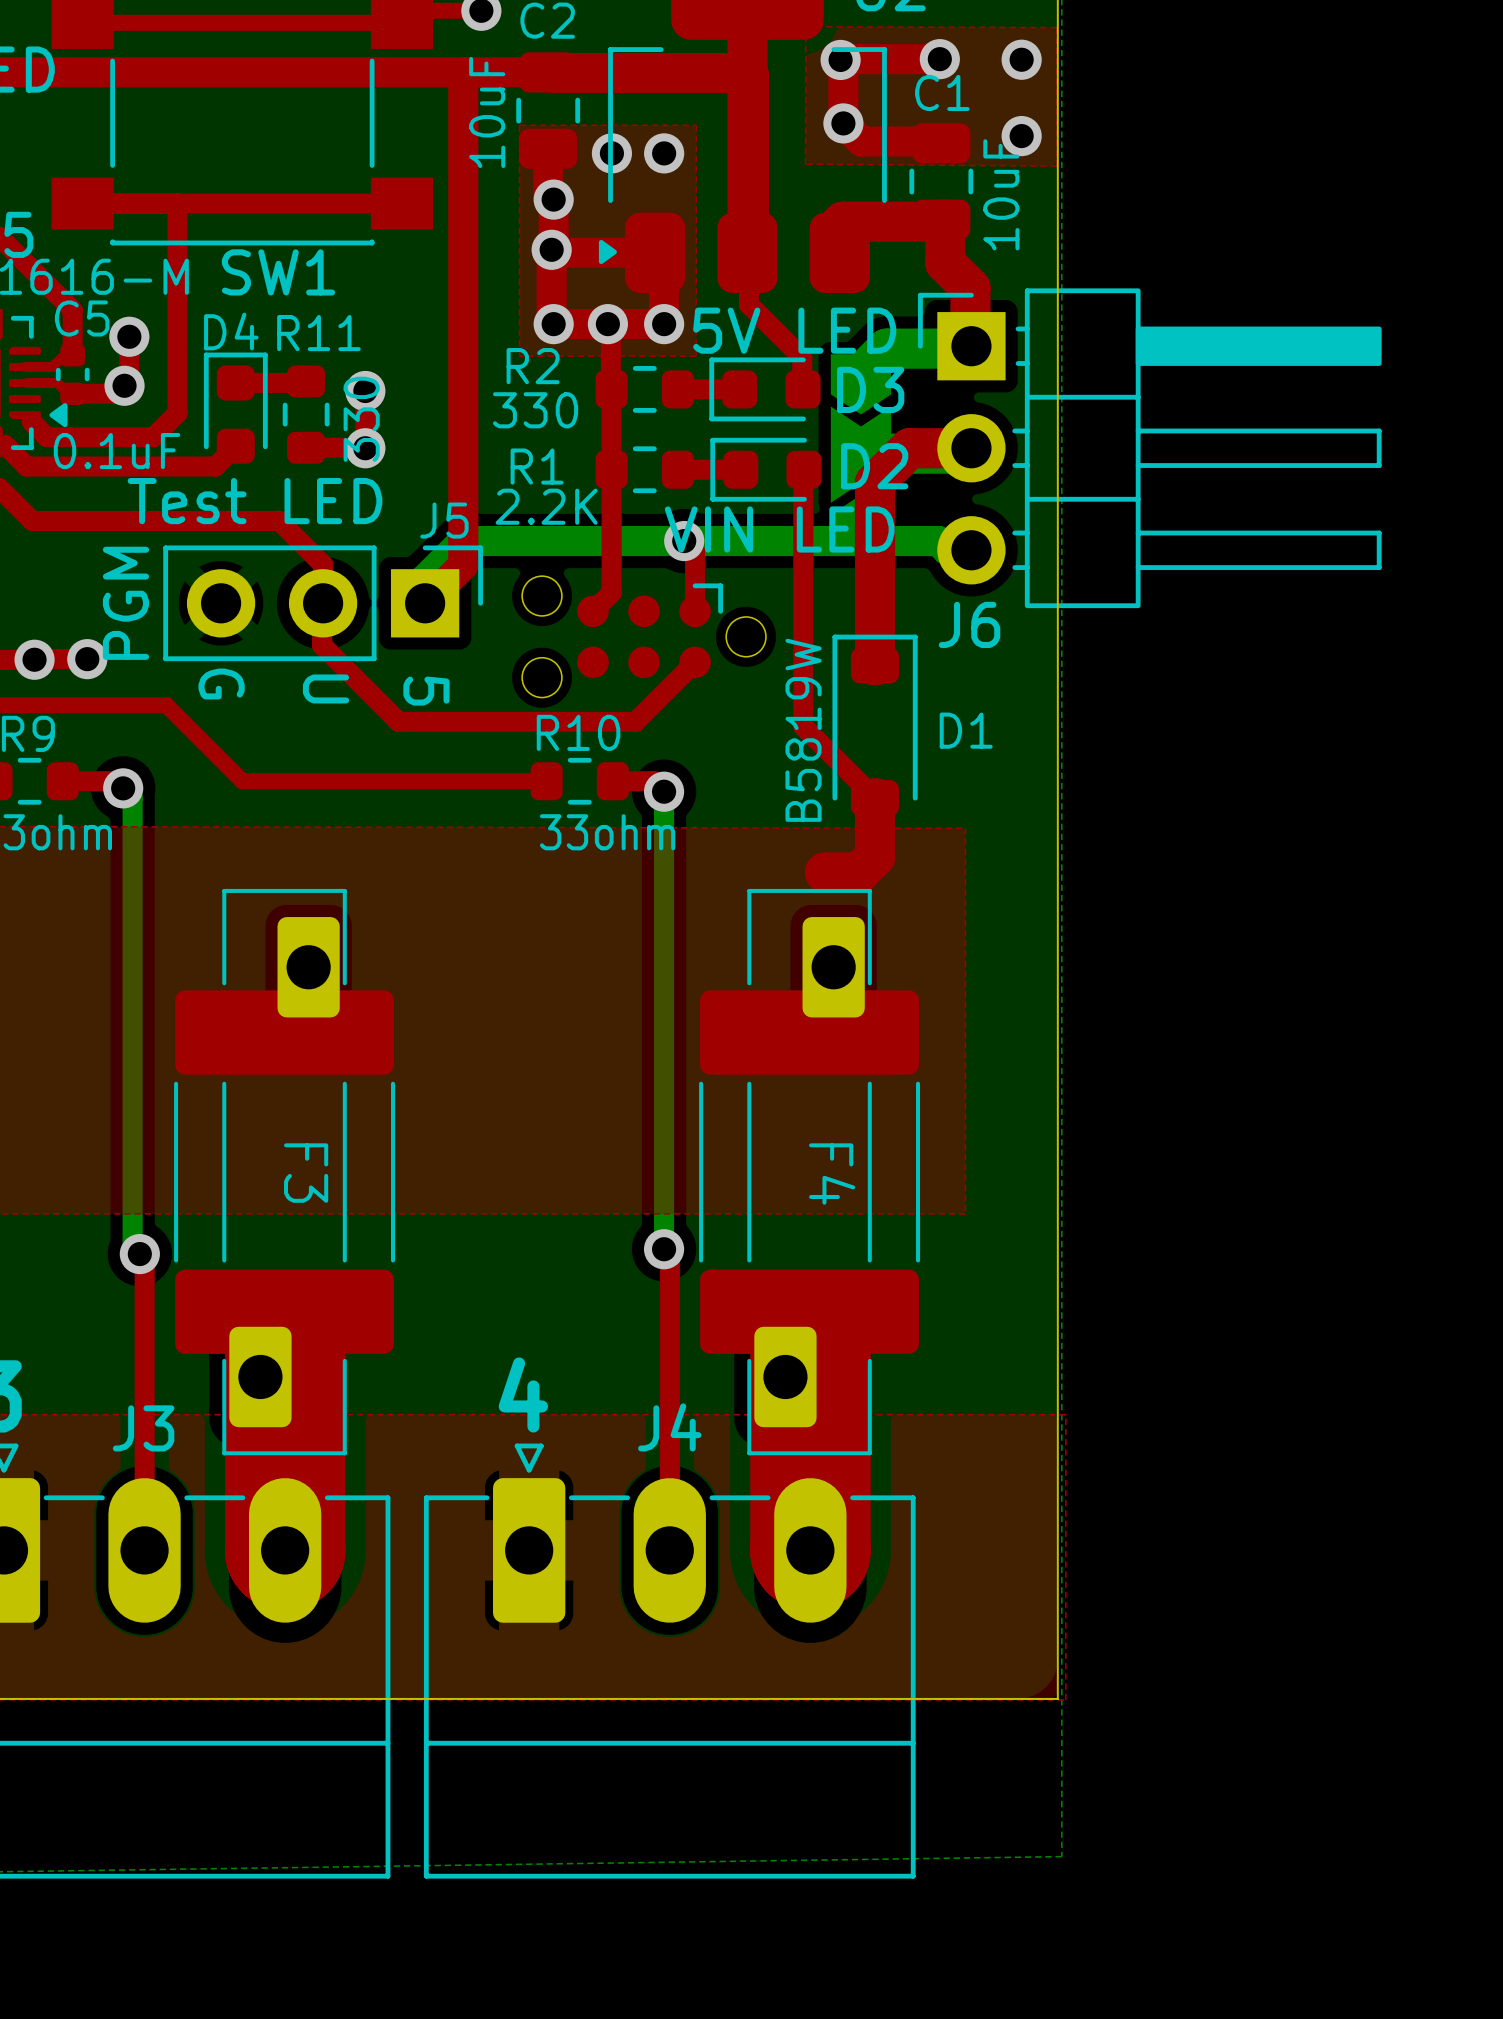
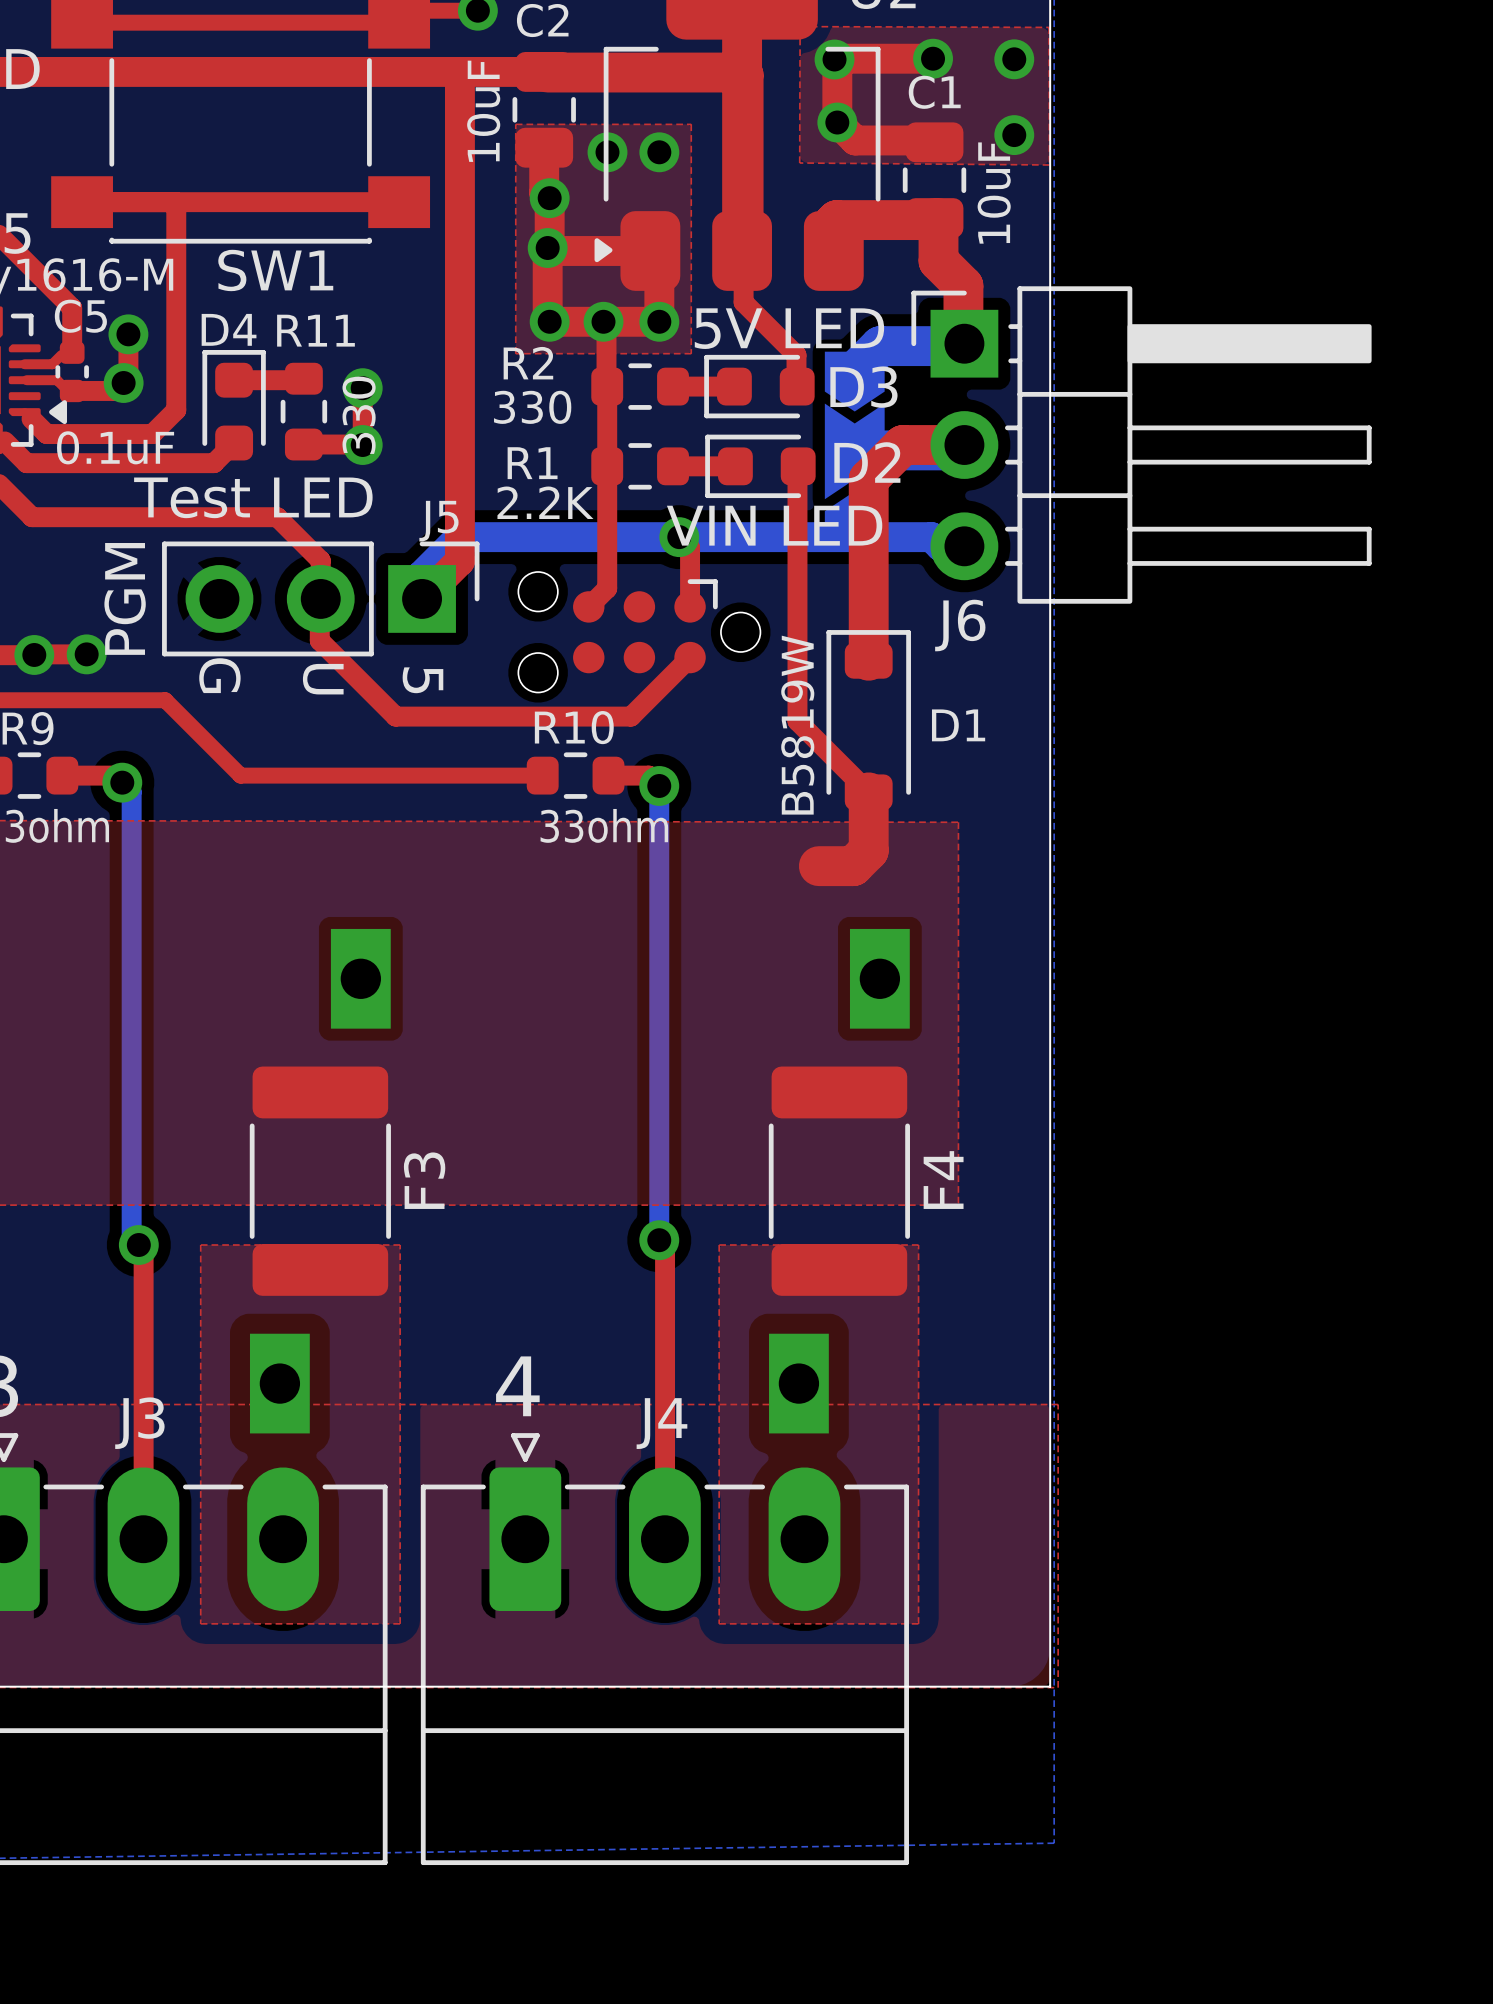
F3 footprint: [174, 888, 396, 1456] -> [249, 928, 391, 1434]
F4 footprint: [699, 888, 921, 1456] -> [768, 928, 910, 1434]
F3 name position: F3 (306, 1173) -> F3 (424, 1180)
F4 name position: F4 (832, 1174) -> F4 (943, 1180)
top zone outline: none -> (200, 1245) (400, 1245) (400, 1623) (200, 1623) (200, 1245)
top zone outline: none -> (719, 1245) (719, 1623) (918, 1623) (918, 1245) (719, 1245)
top track: (285, 1334) (285, 1550) -> none
top track: (810, 1334) (810, 1550) -> none

